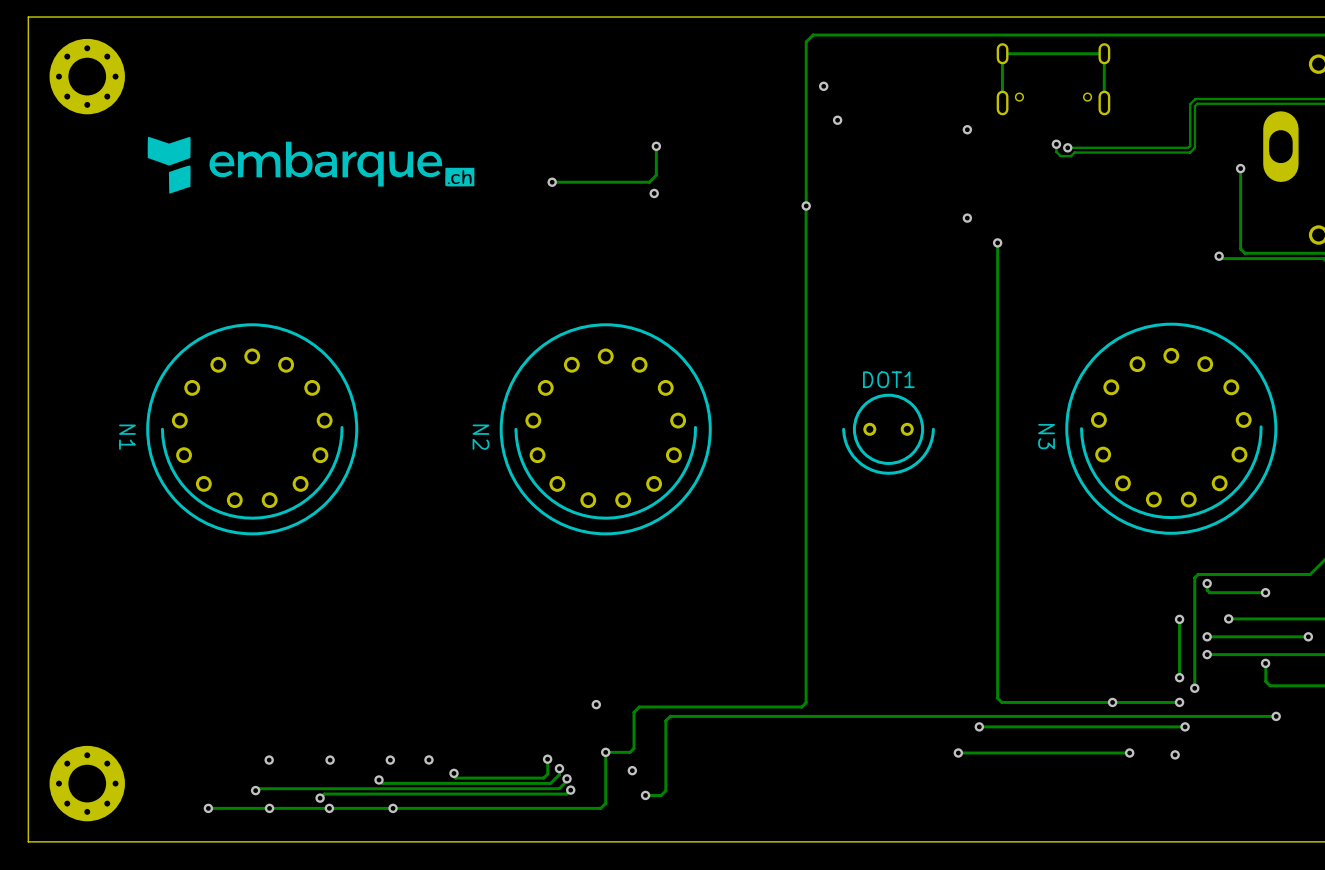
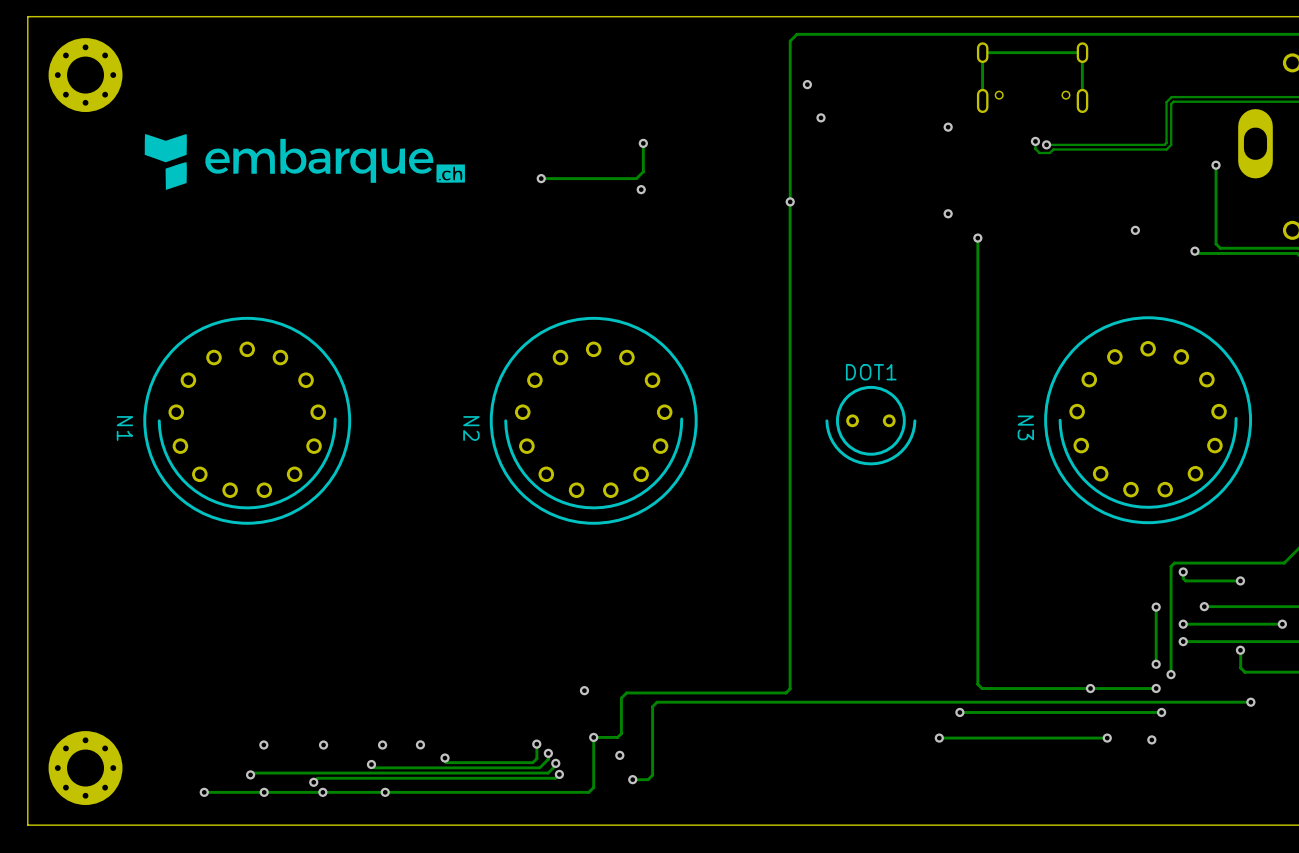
via: none -> (1135, 230)

